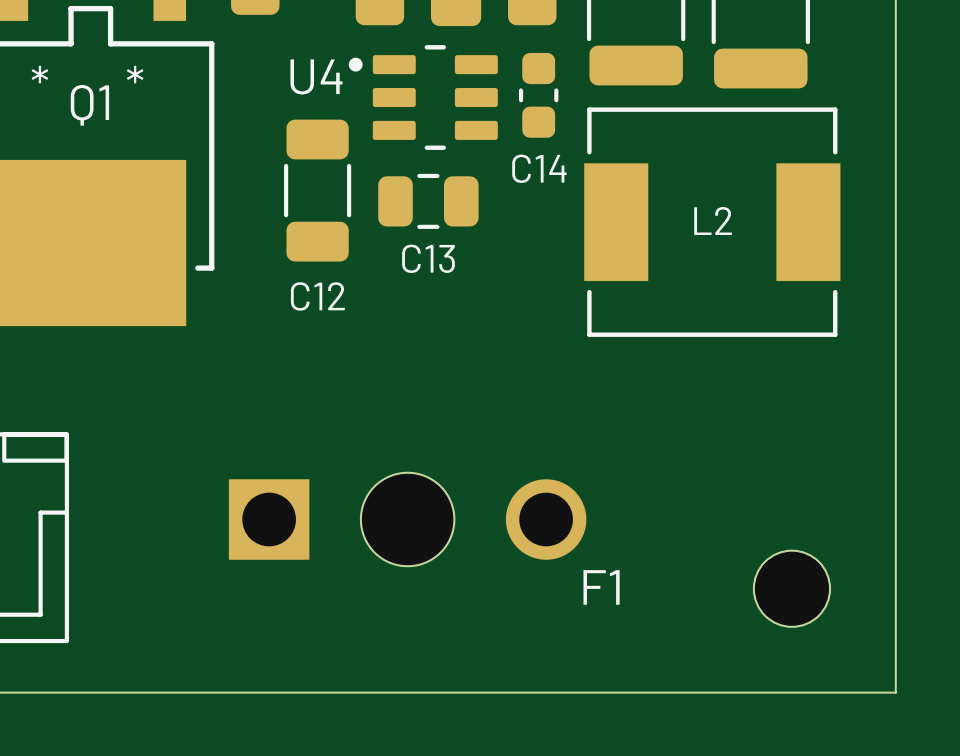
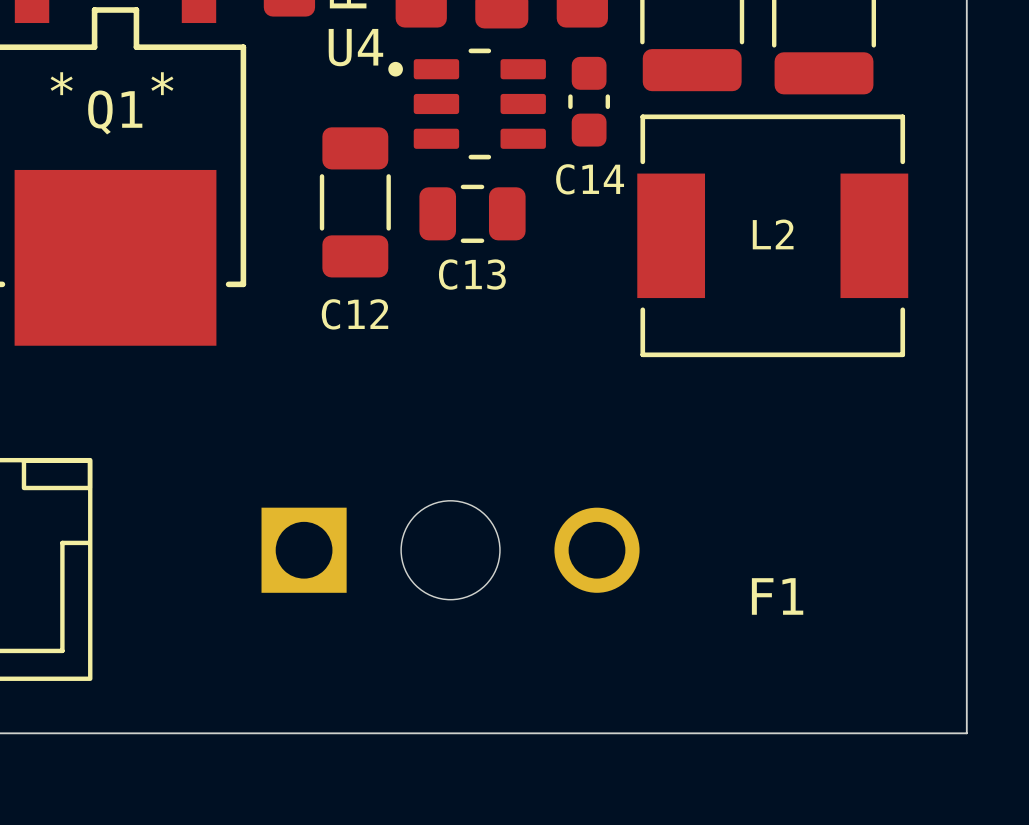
U4 name position: U4 (316, 76) -> U4 (355, 47)
F1 name position: F1 (601, 587) -> F1 (777, 596)
part: (791, 588) -> none

